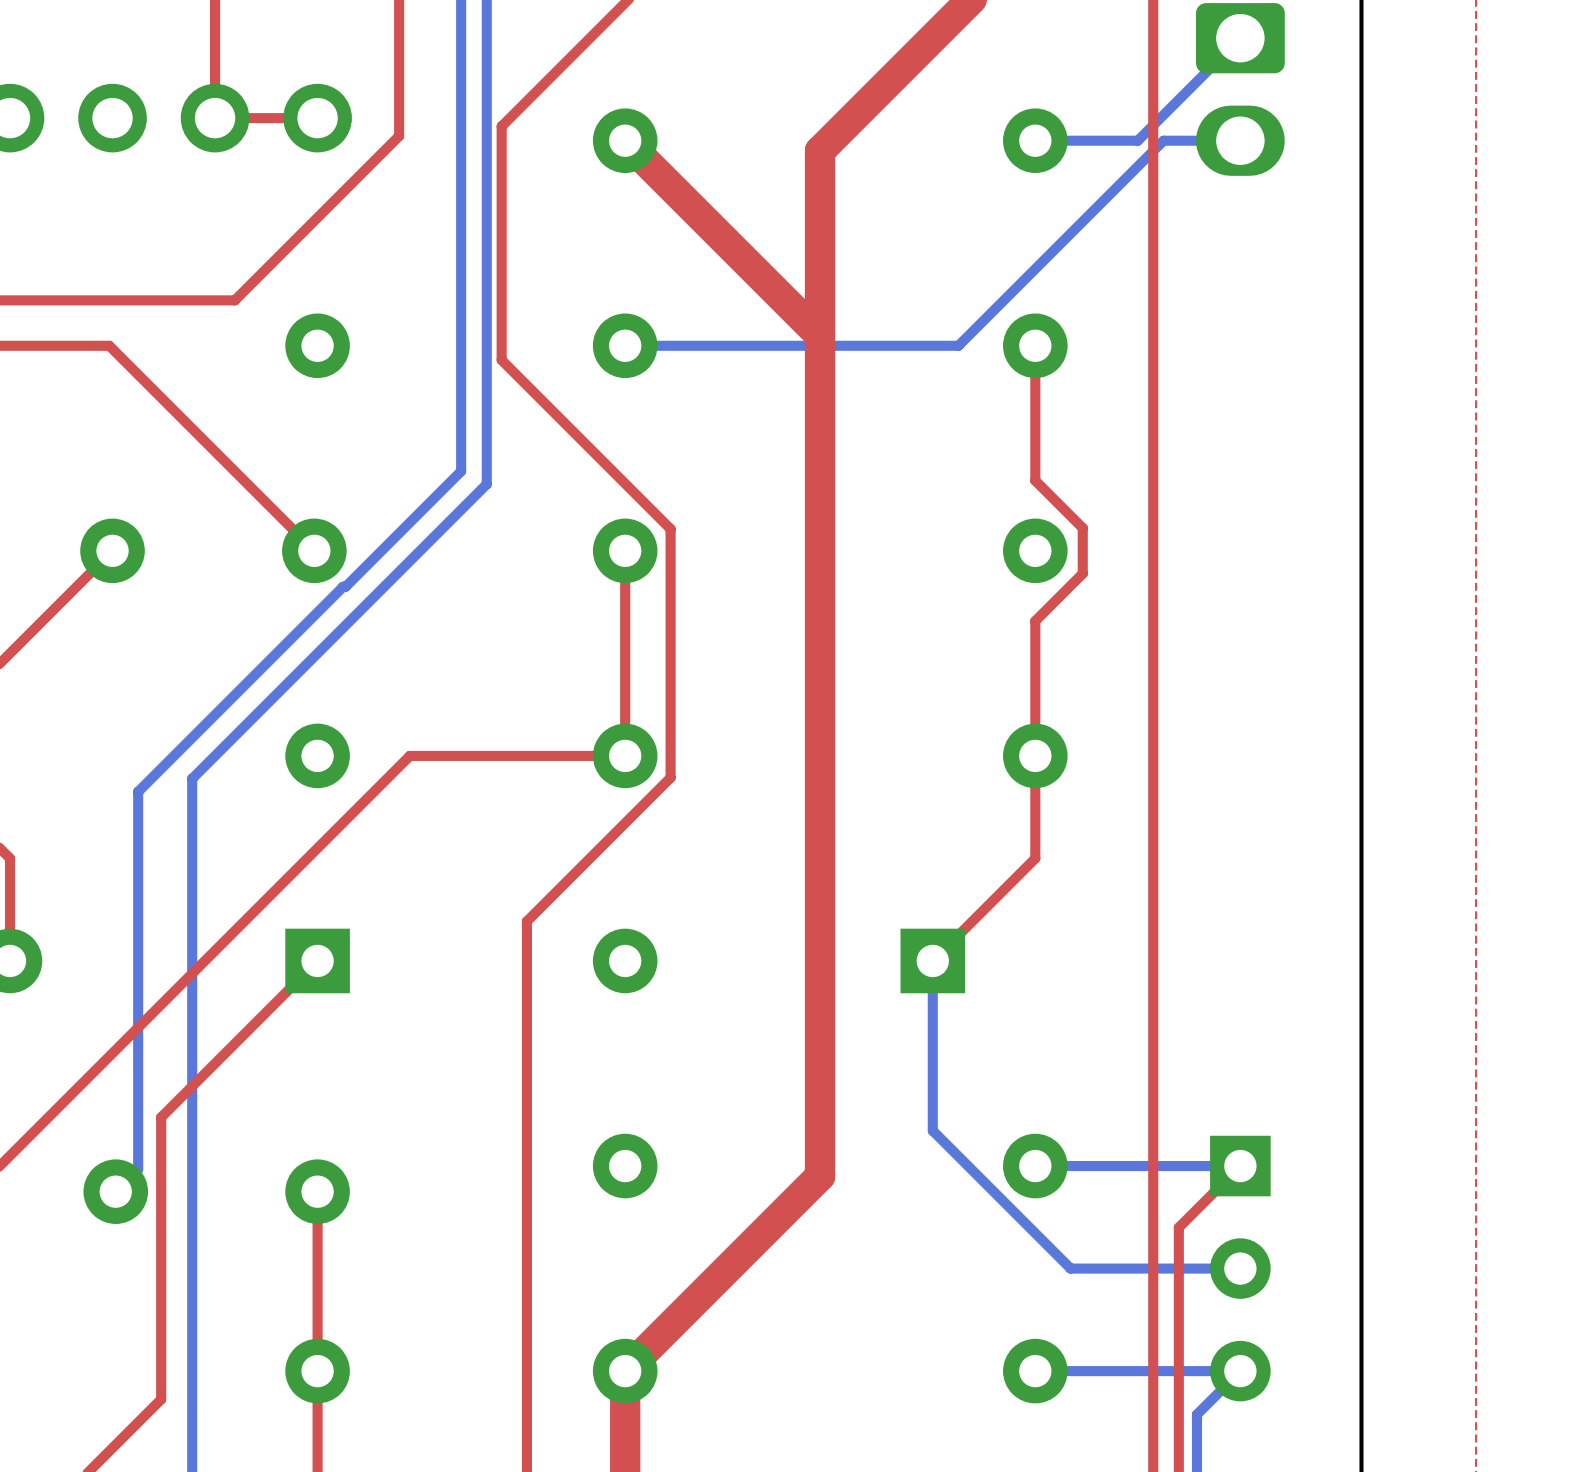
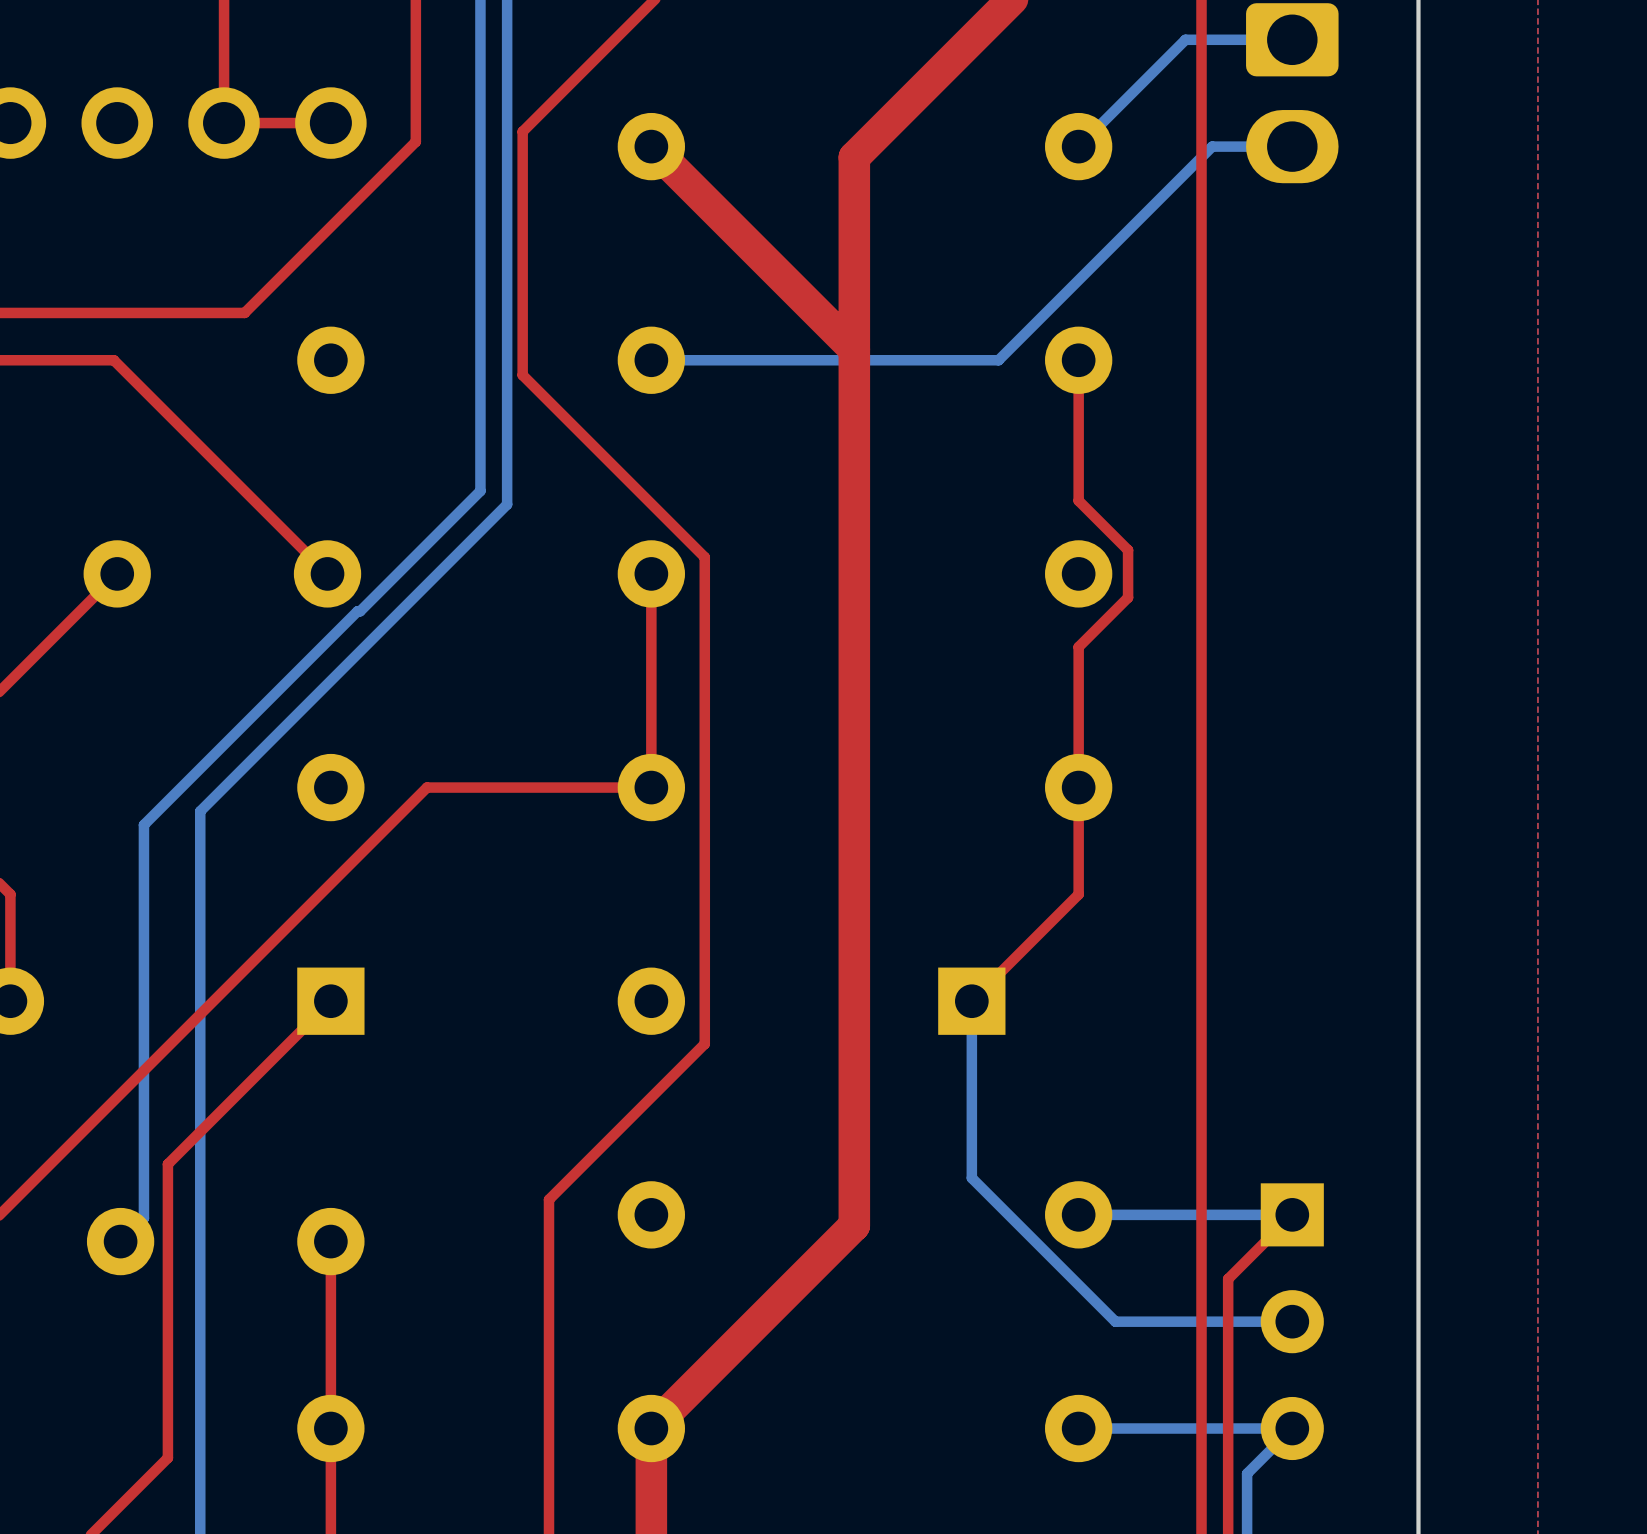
bottom track: (1240, 38) (1137, 140) (1035, 140) -> (1292, 39) (1185, 39) (1078, 146)
top track: (670, 529) (670, 777) (526, 921) (526, 1151) -> (698, 551) (704, 557) (704, 1043) (548, 1199)

